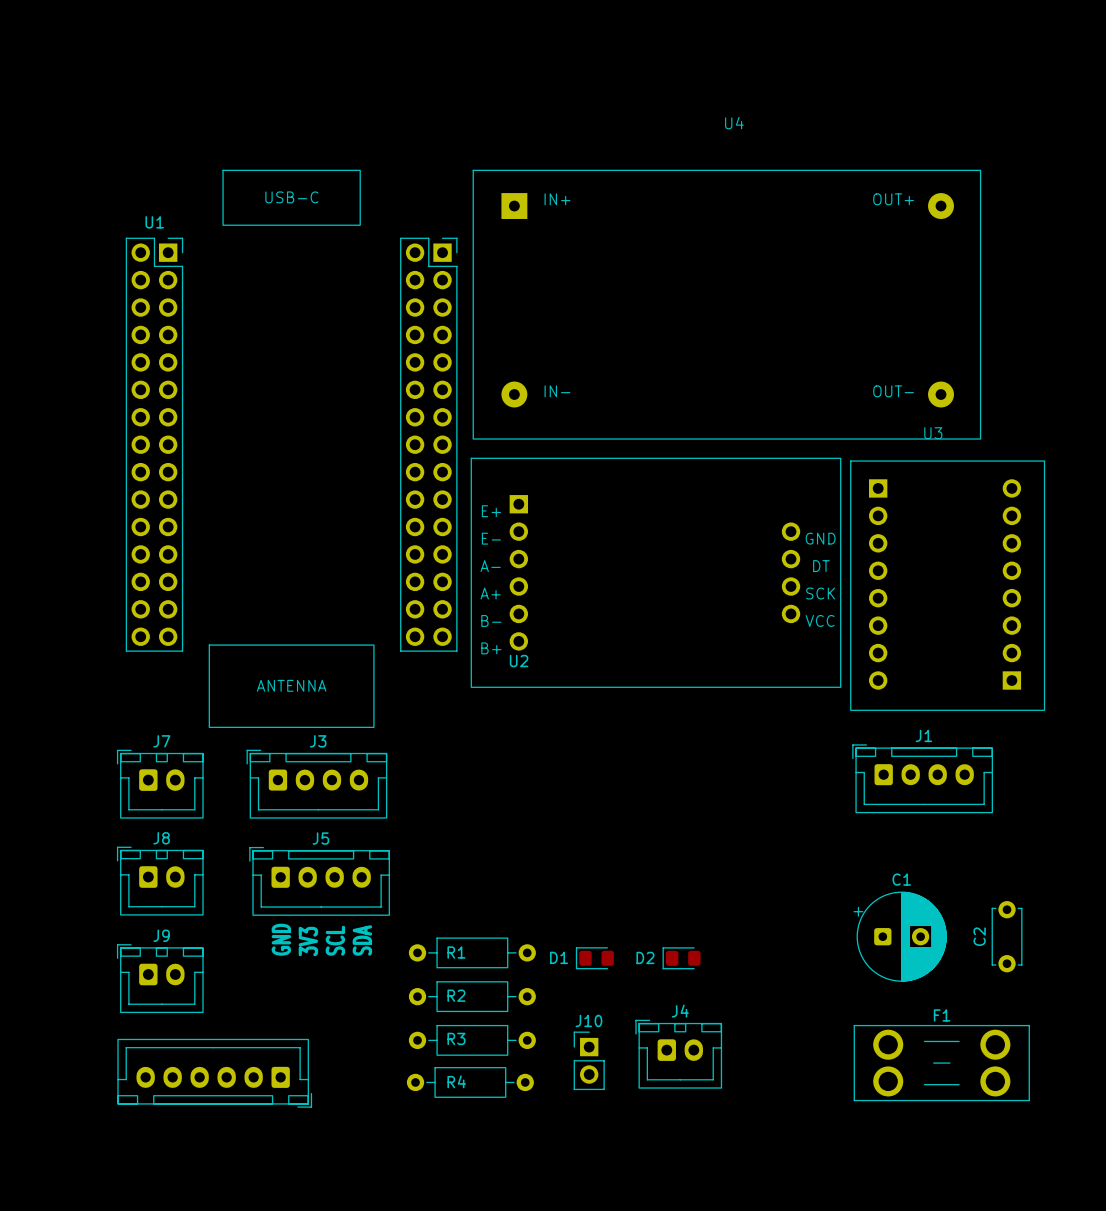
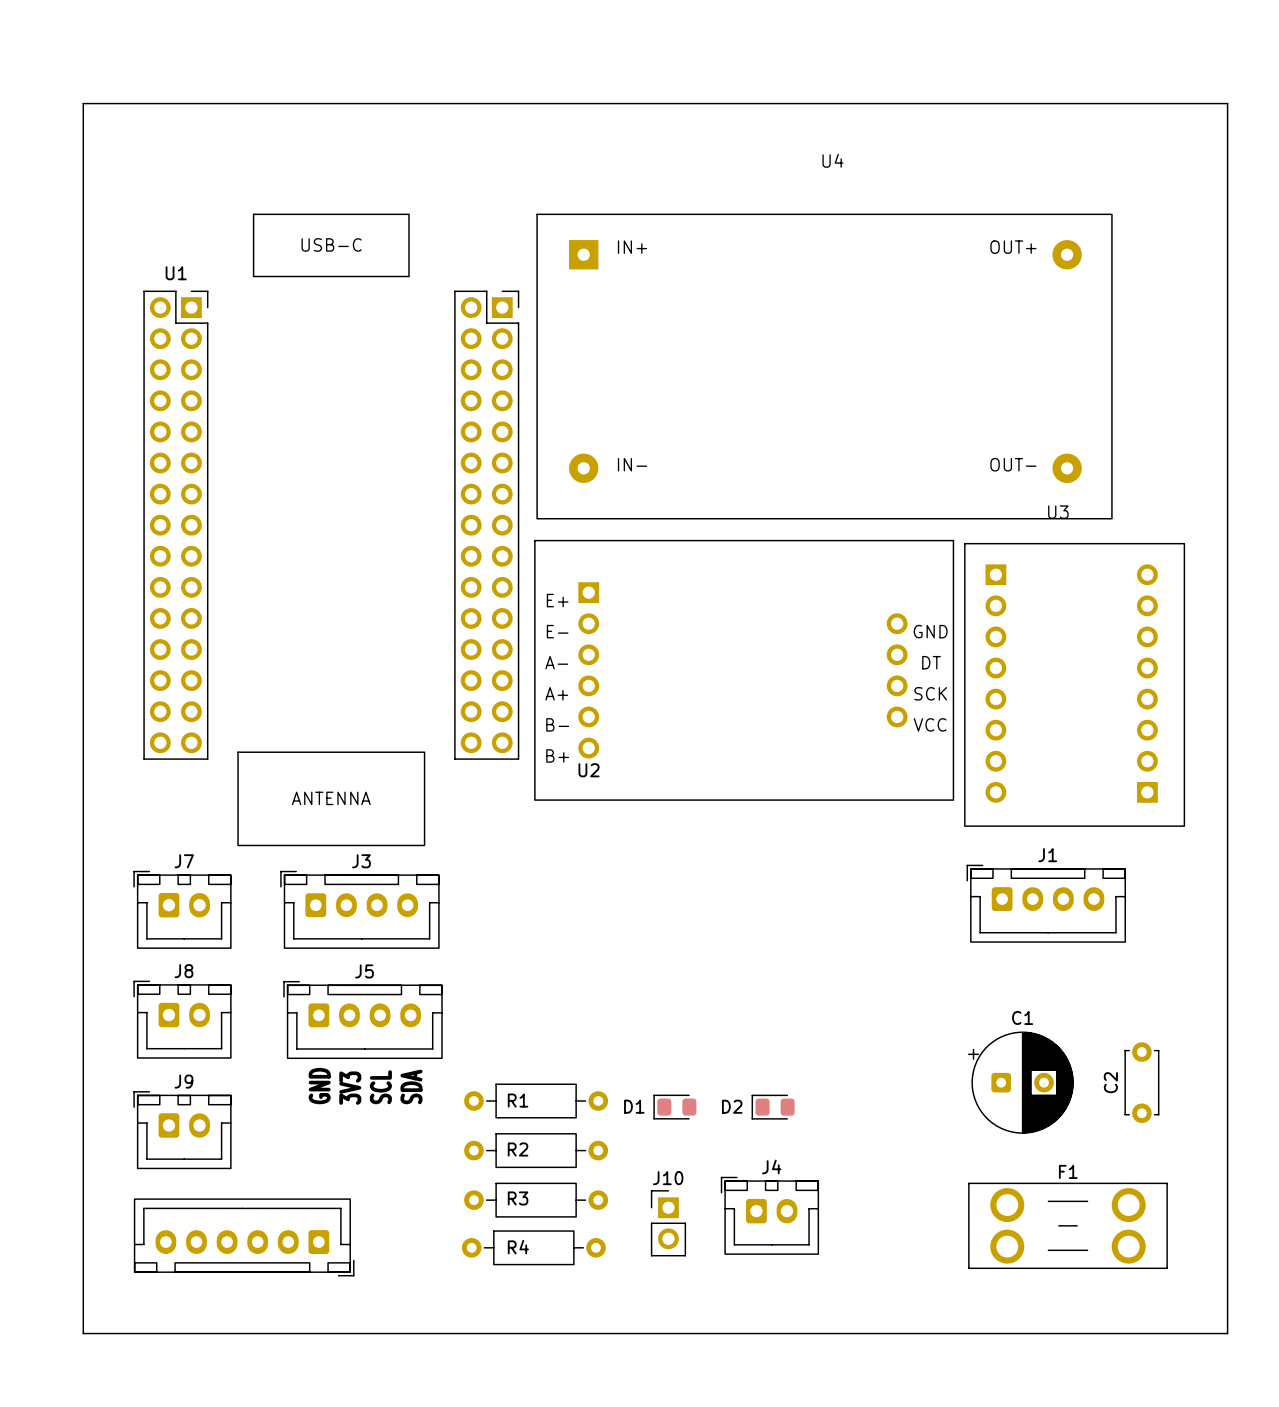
board edge: none -> (83, 103) (1227, 103) (1227, 1333) (83, 1333) (83, 103)

